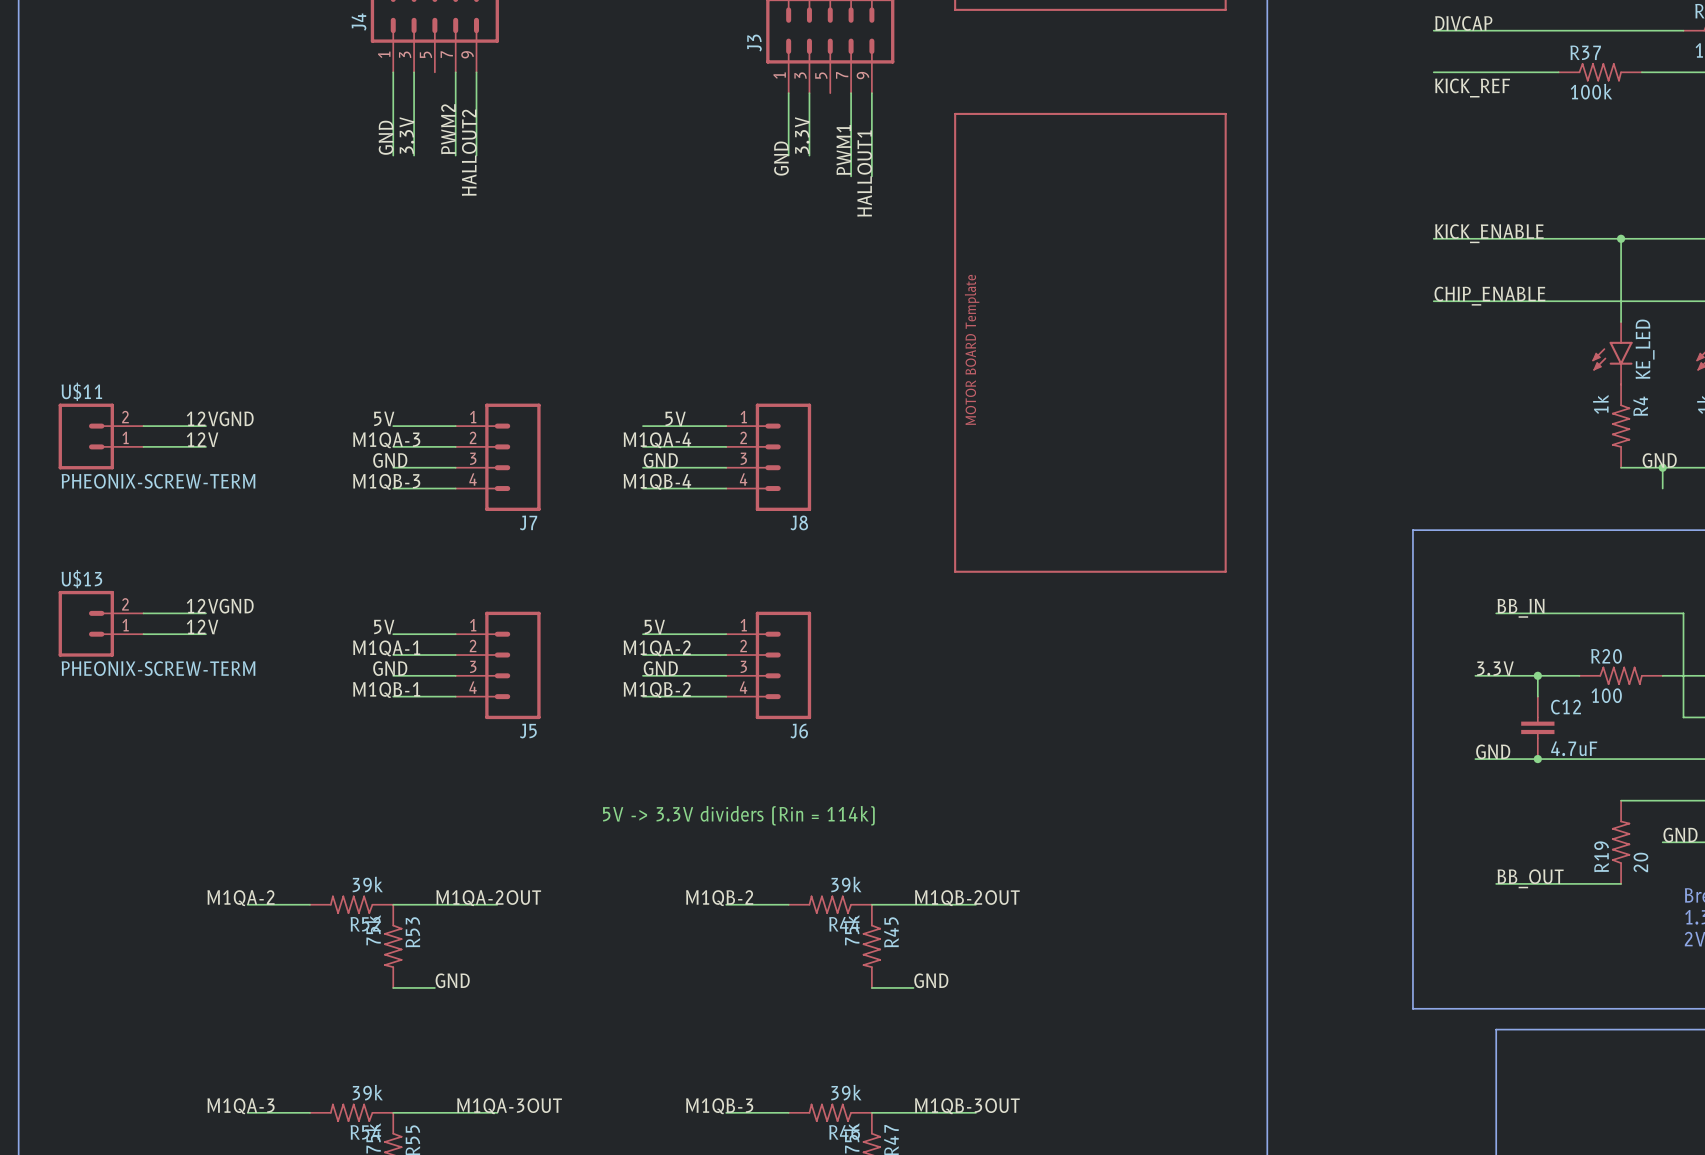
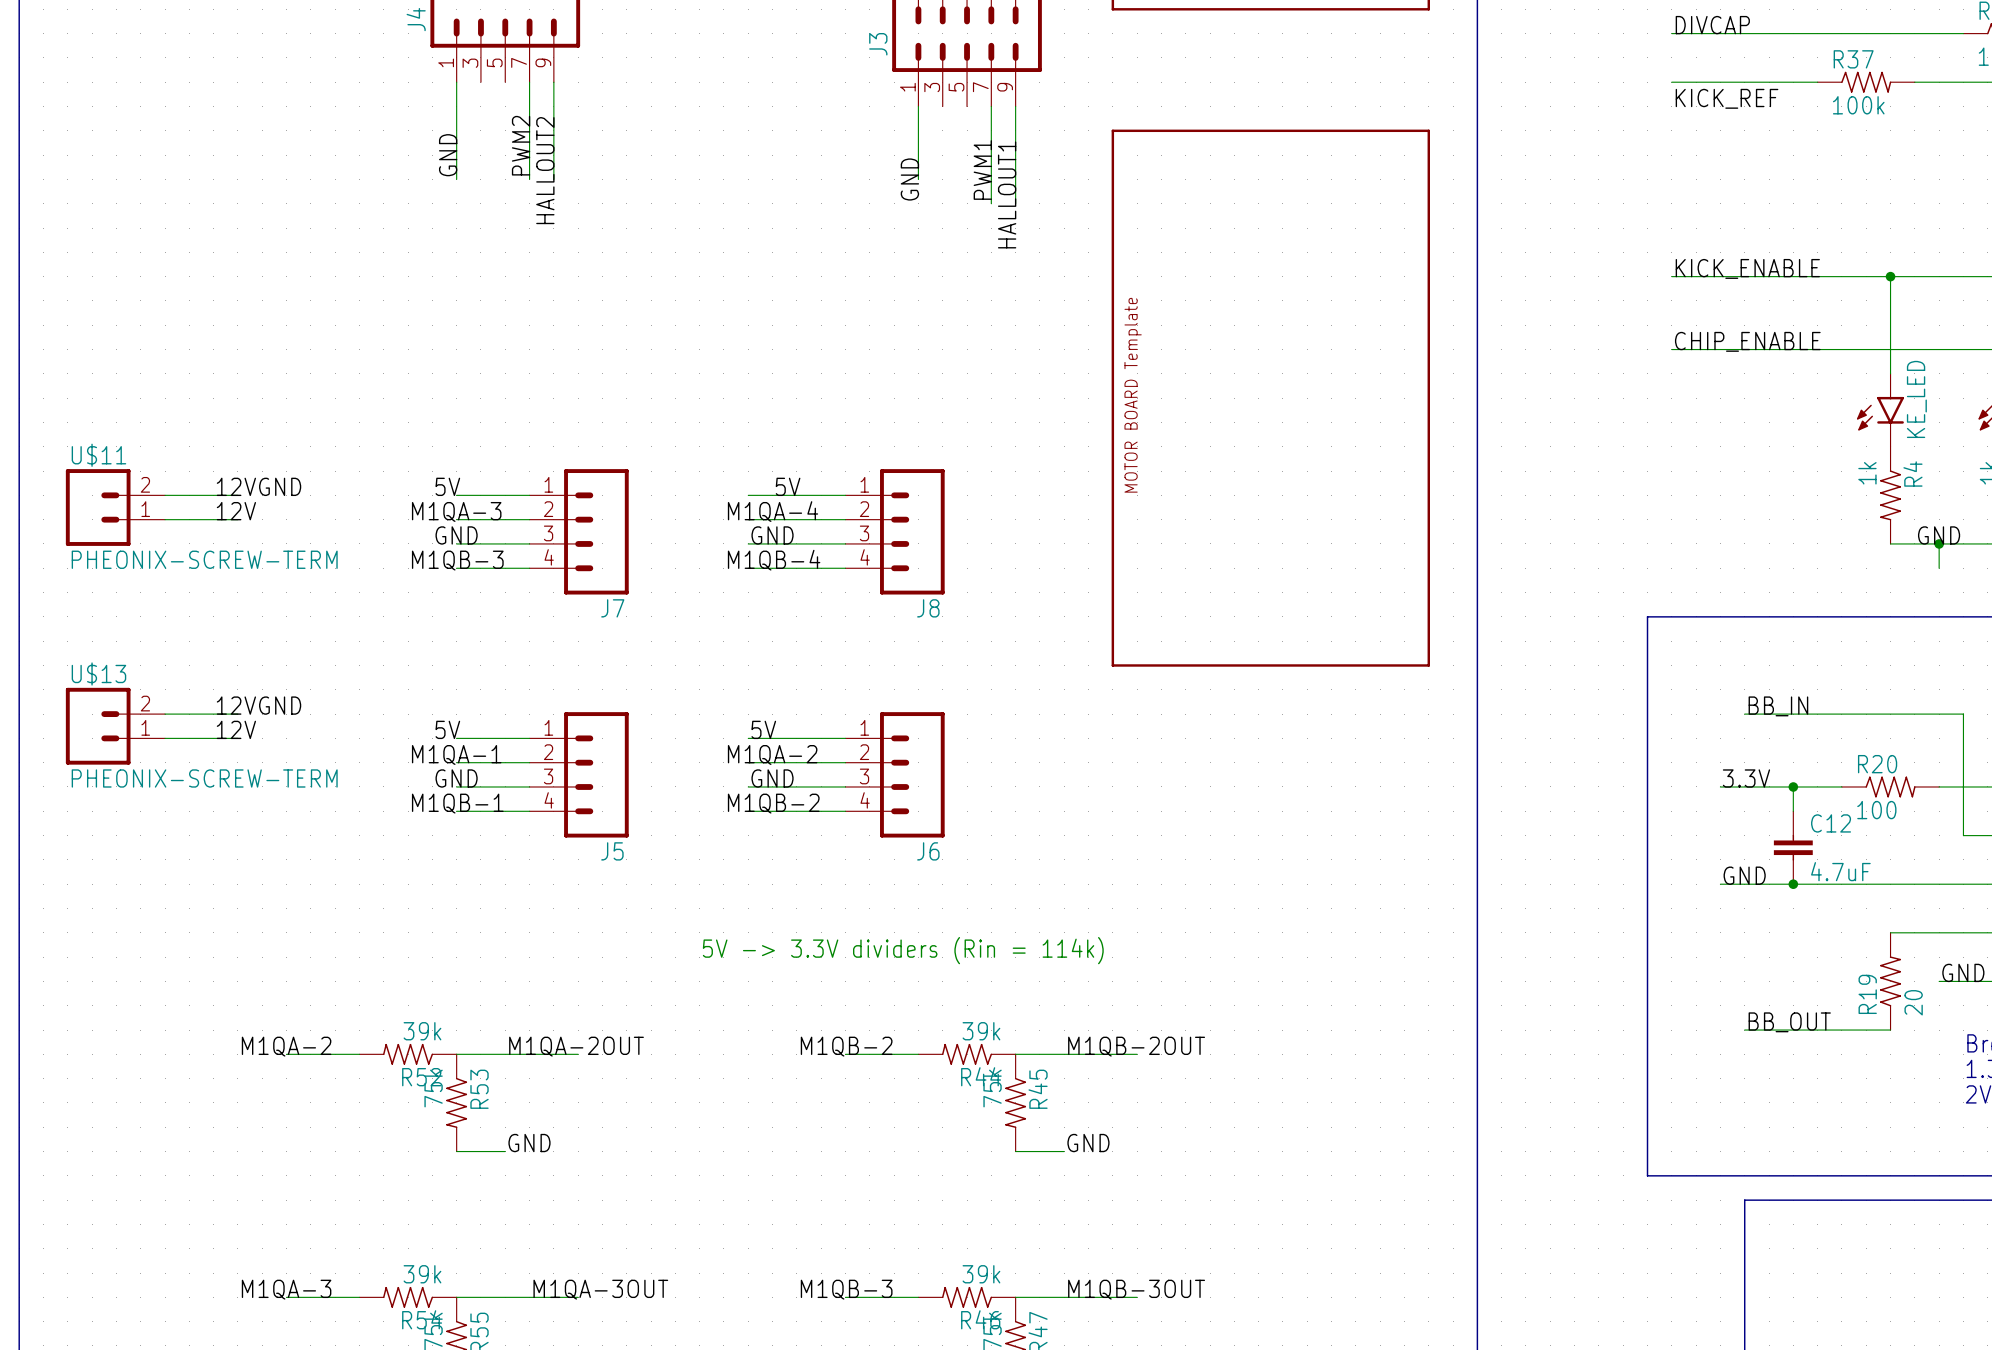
wire: (414, 72) (414, 155) -> none
wire: (809, 93) (809, 155) -> none
label: 3.3V (406, 135) -> none
label: 3.3V (802, 135) -> none

